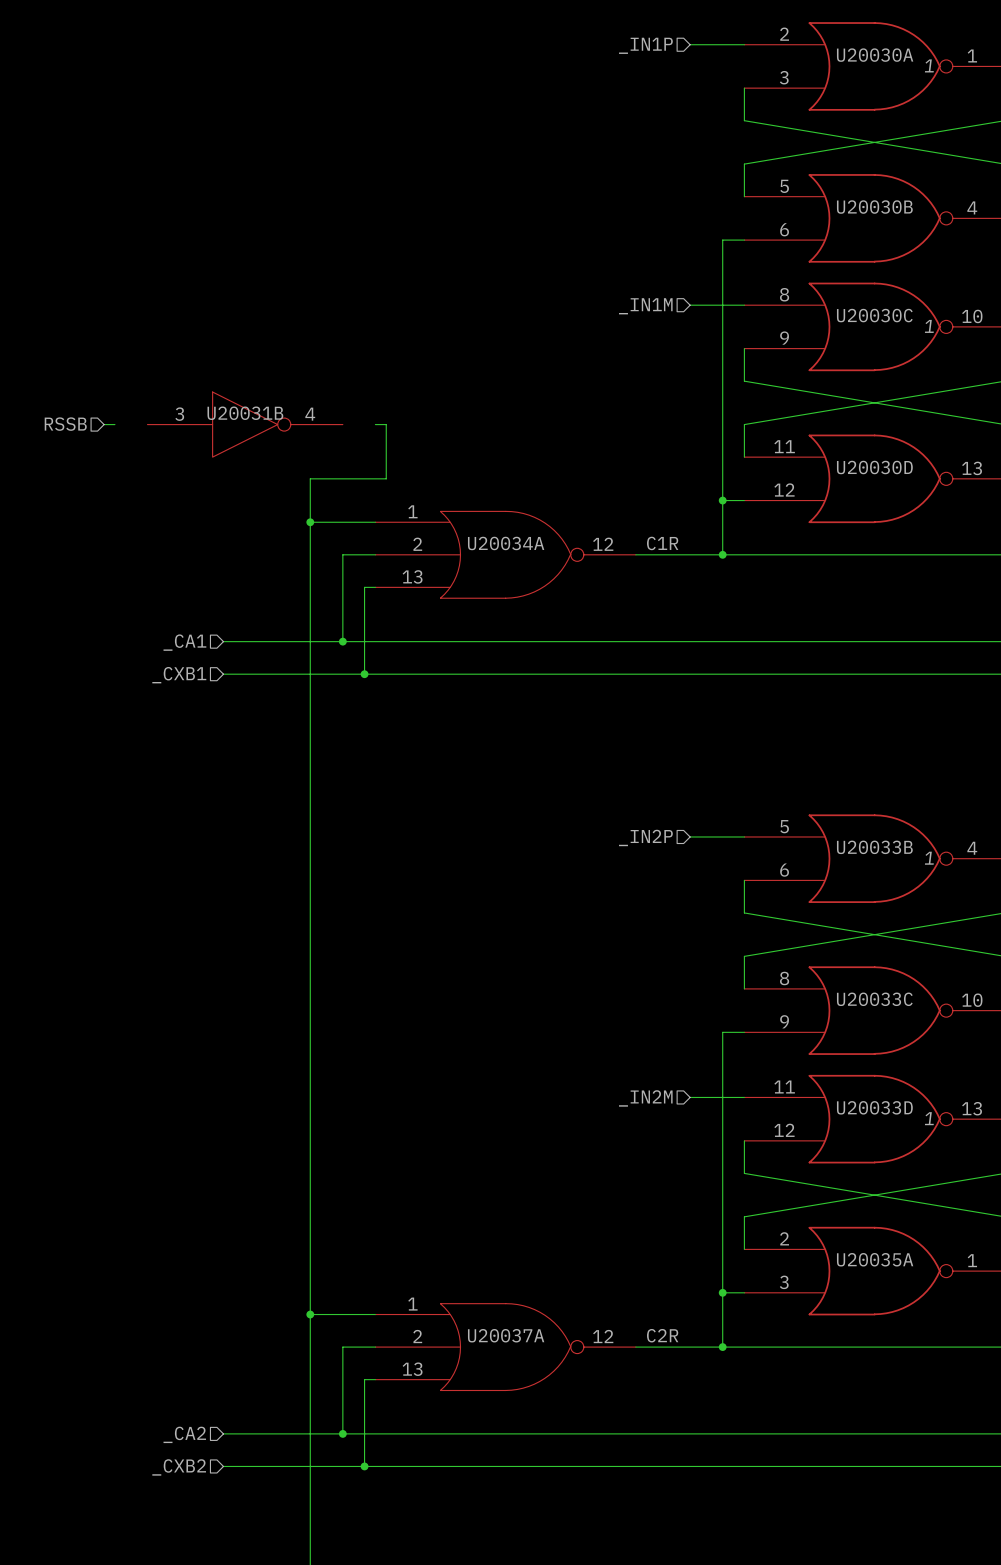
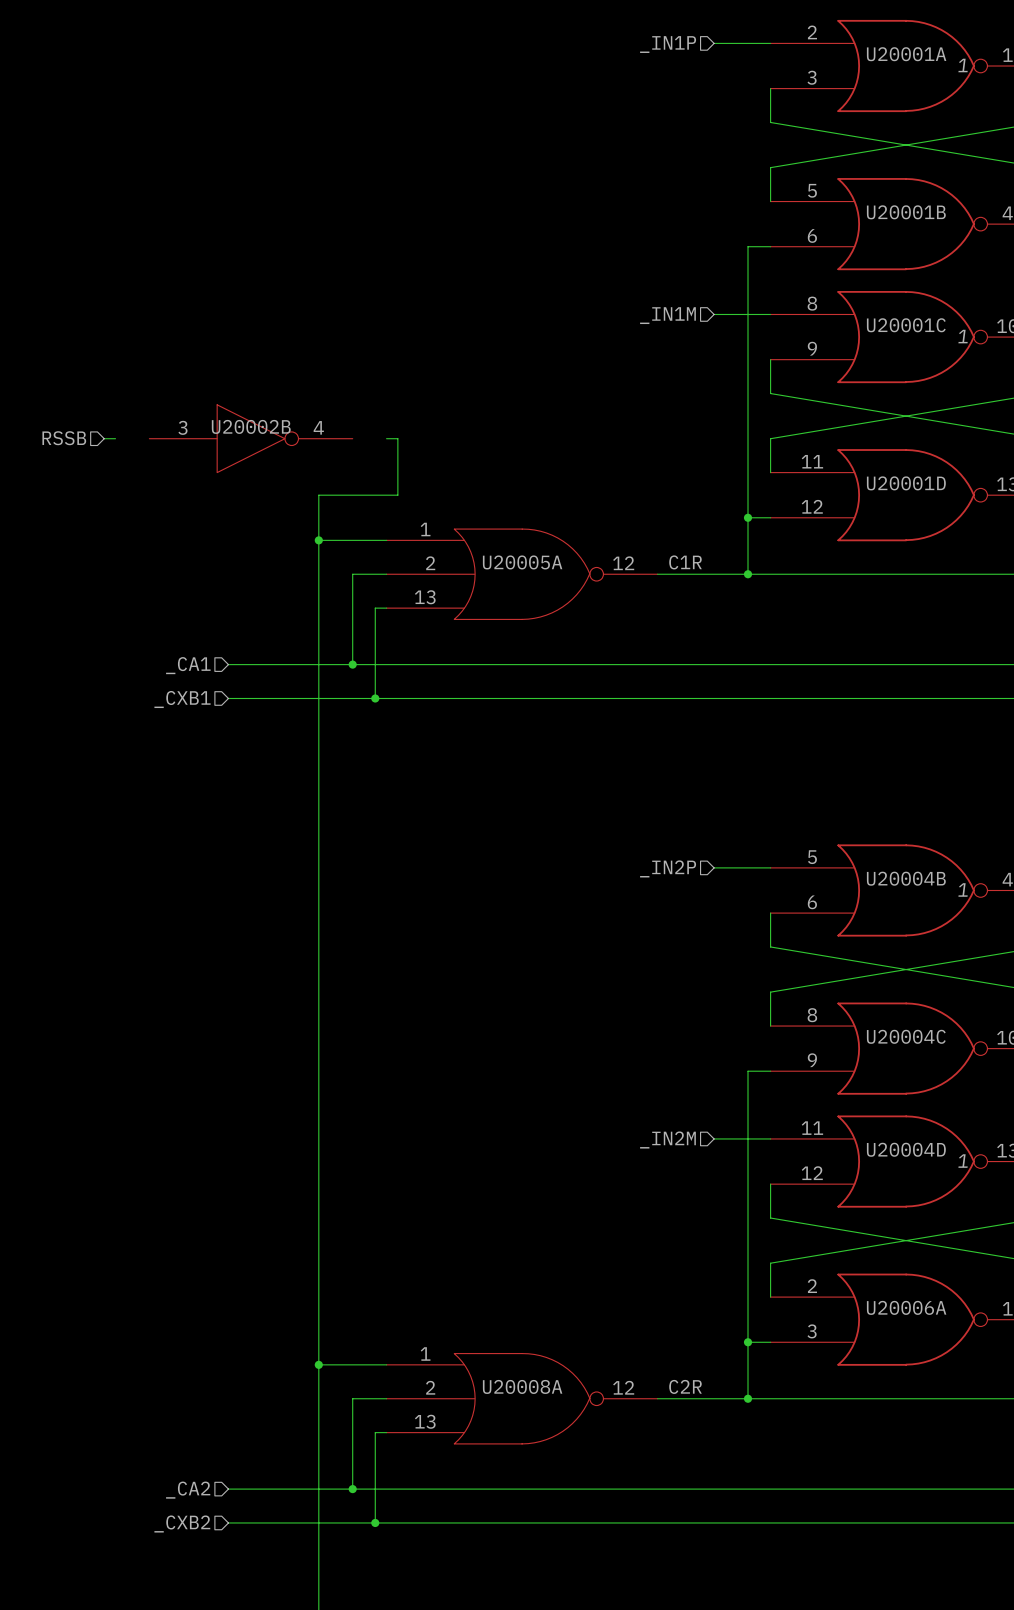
U20030A name: U20030A (875, 55) -> U20001A (906, 54)
U20030B name: U20030B (874, 207) -> U20001B (906, 212)
U20030C name: U20030C (874, 315) -> U20001C (906, 325)
U20031B name: U20031B (245, 413) -> U20002B (251, 426)
U20030D name: U20030D (874, 467) -> U20001D (906, 483)
U20034A name: U20034A (506, 543) -> U20005A (522, 562)
U20033B name: U20033B (874, 847) -> U20004B (906, 878)
U20033C name: U20033C (874, 999) -> U20004C (906, 1036)
U20033D name: U20033D (874, 1107) -> U20004D (906, 1149)
U20035A name: U20035A (875, 1259) -> U20006A (906, 1307)
U20037A name: U20037A (506, 1335) -> U20008A (522, 1386)

